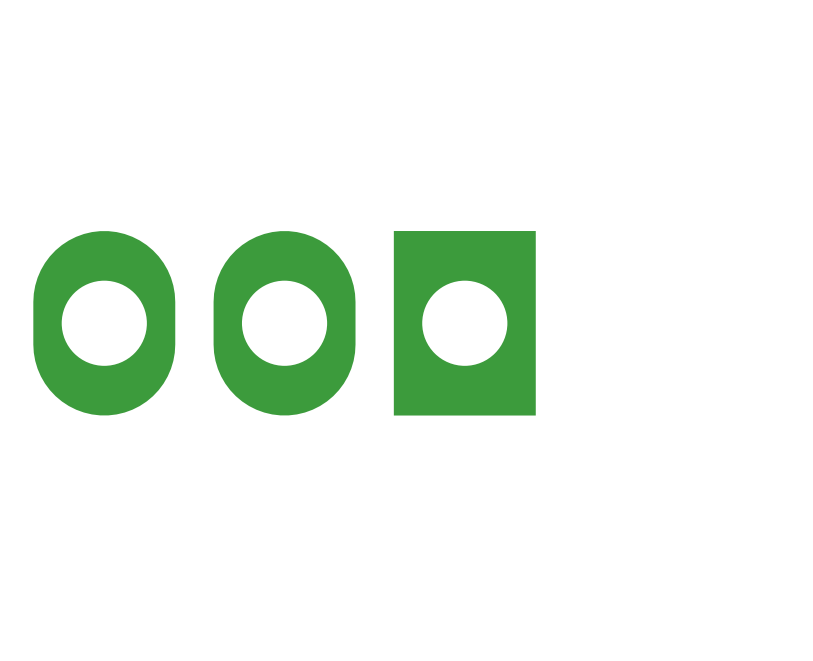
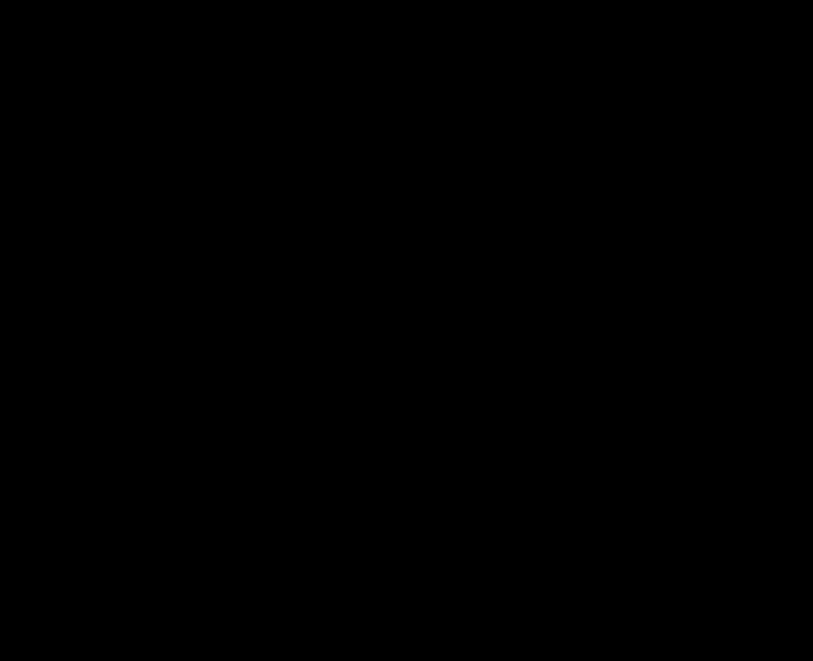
part: (284, 323) -> none

